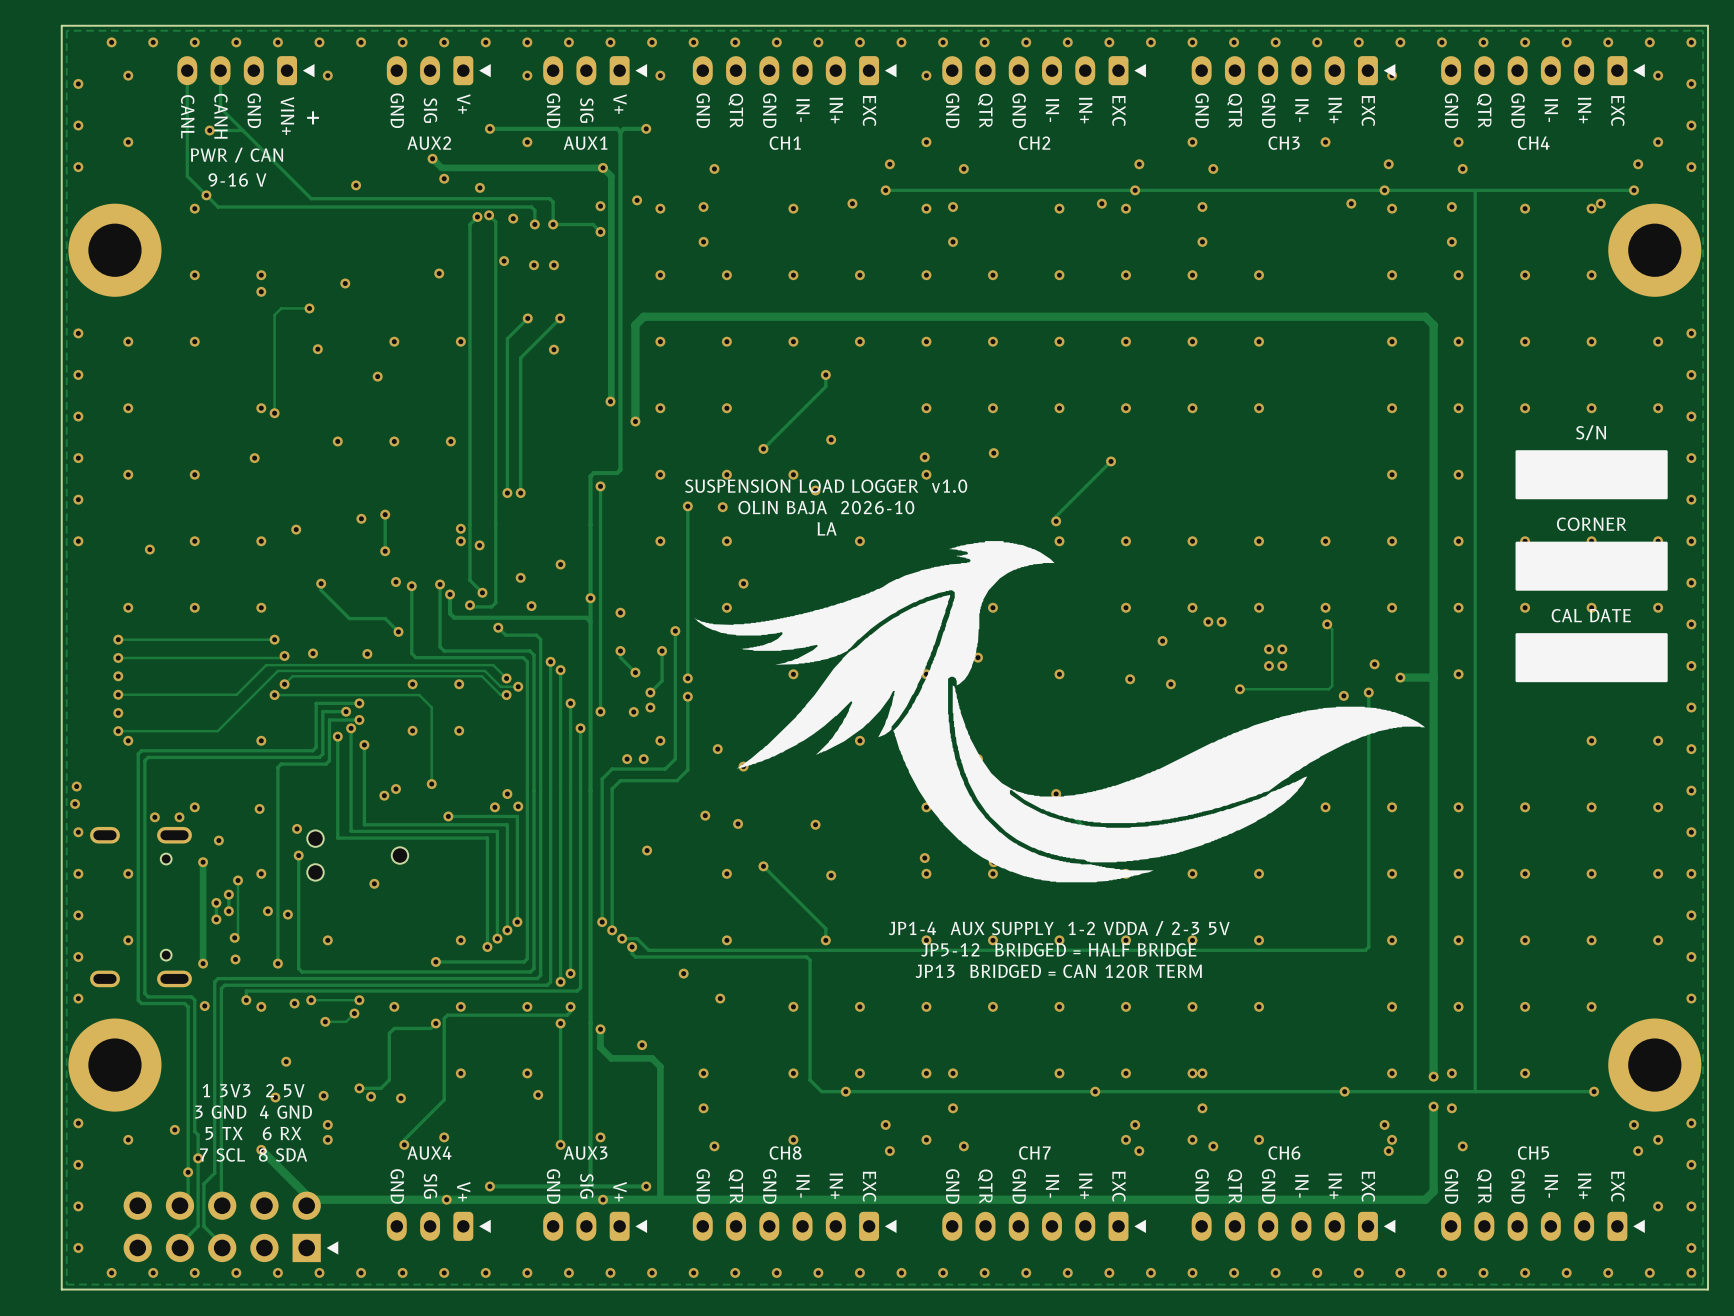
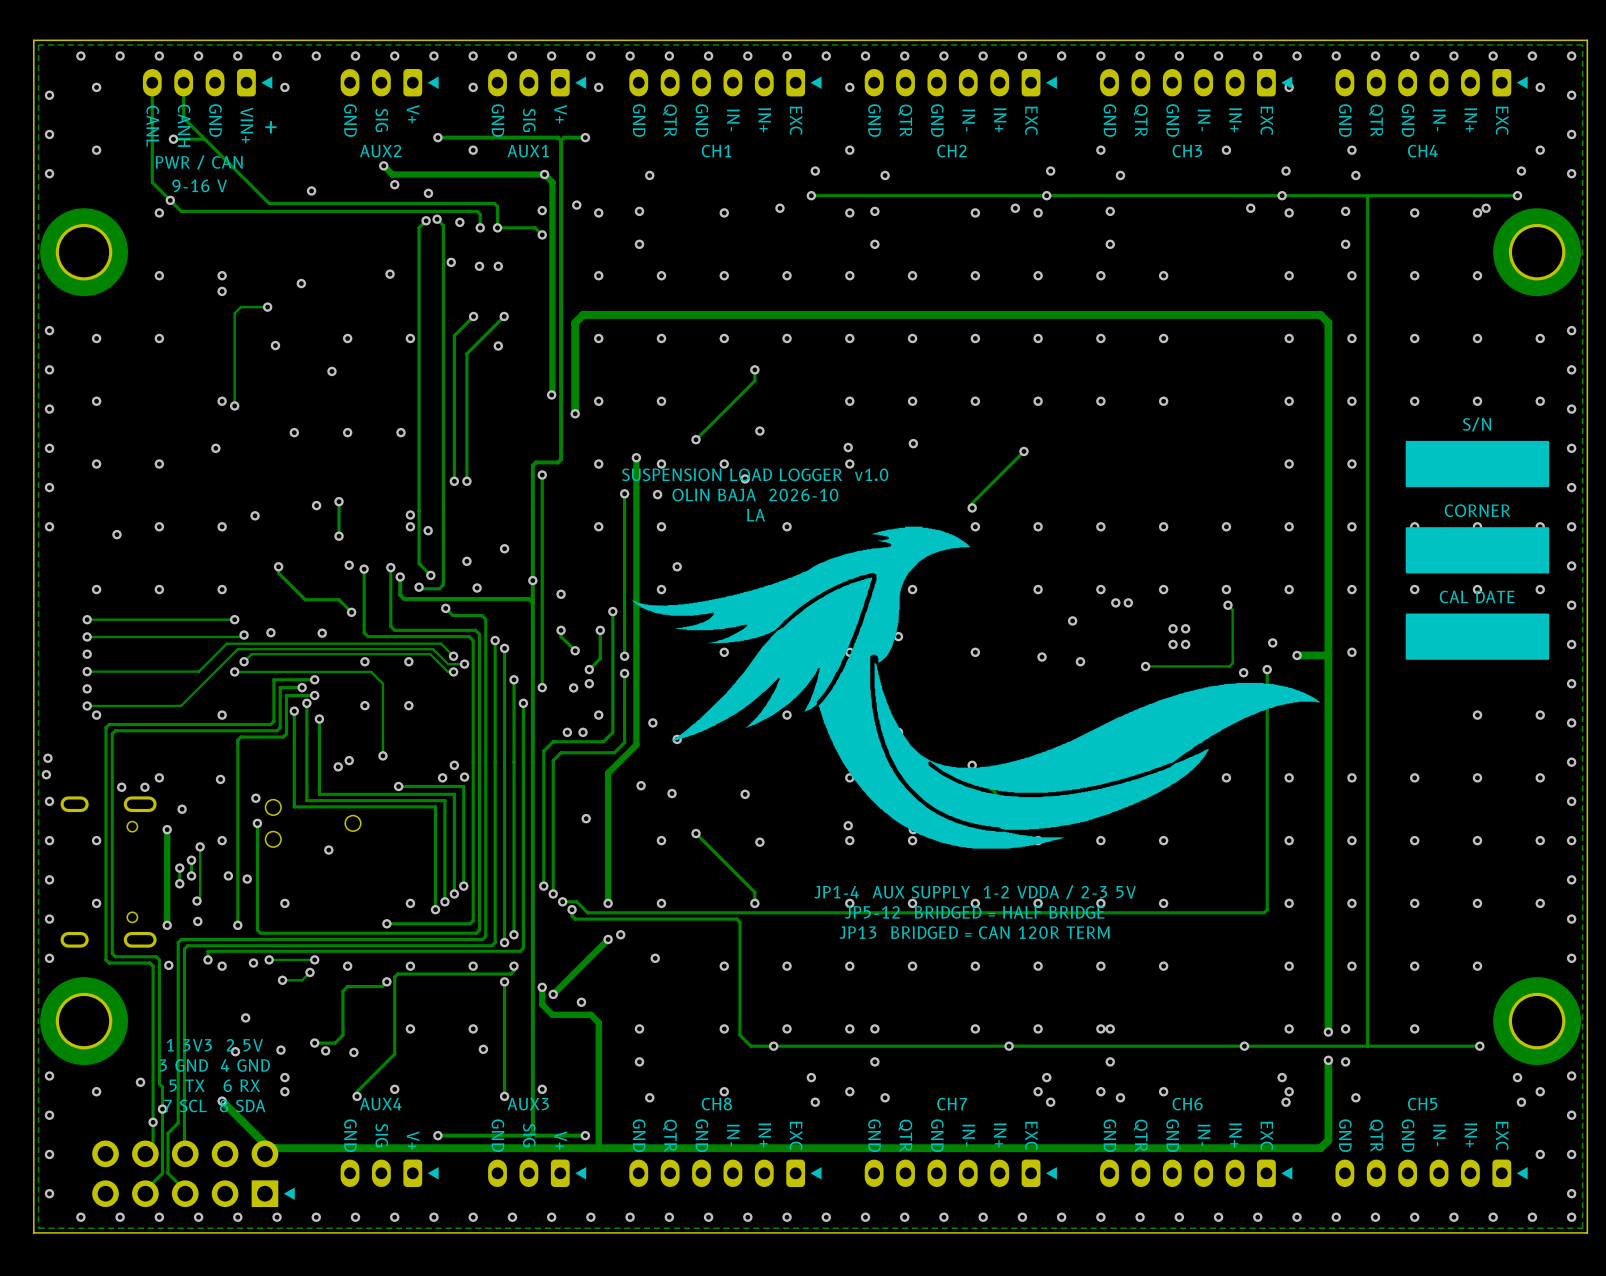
track: none -> (636, 457) (636, 744) (608, 773) (608, 903)
via: none -> (636, 457)
via: none -> (608, 903)
track: none -> (608, 939) (553, 994)
via: none -> (608, 939)
via: none -> (553, 994)
via: (446, 1199) -> none
via: (603, 1199) -> none

